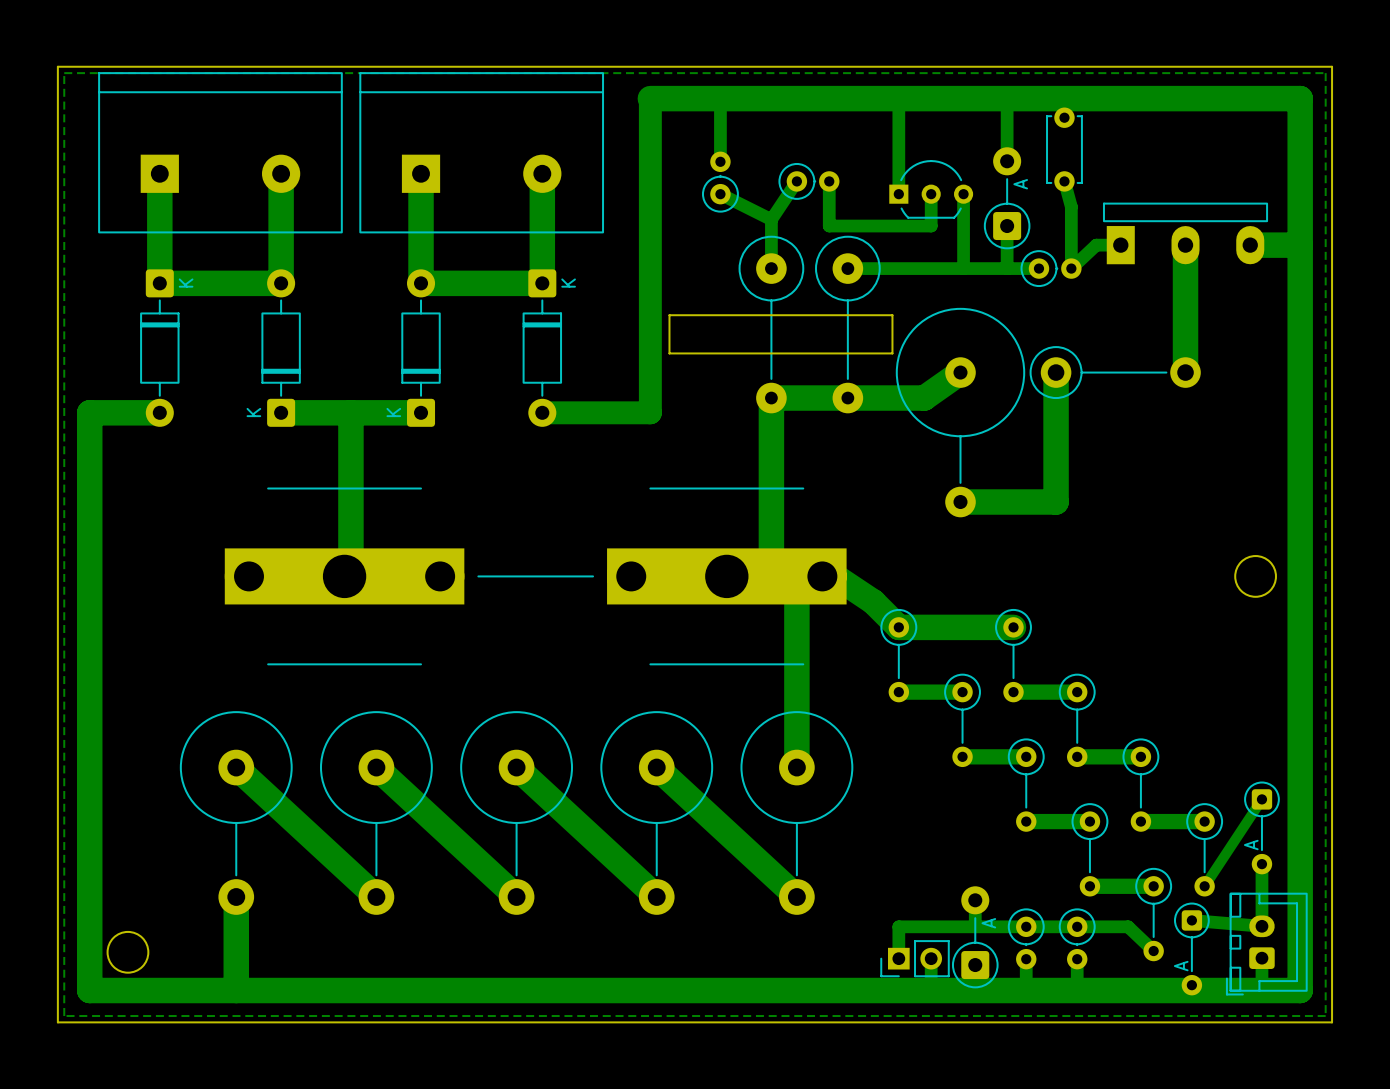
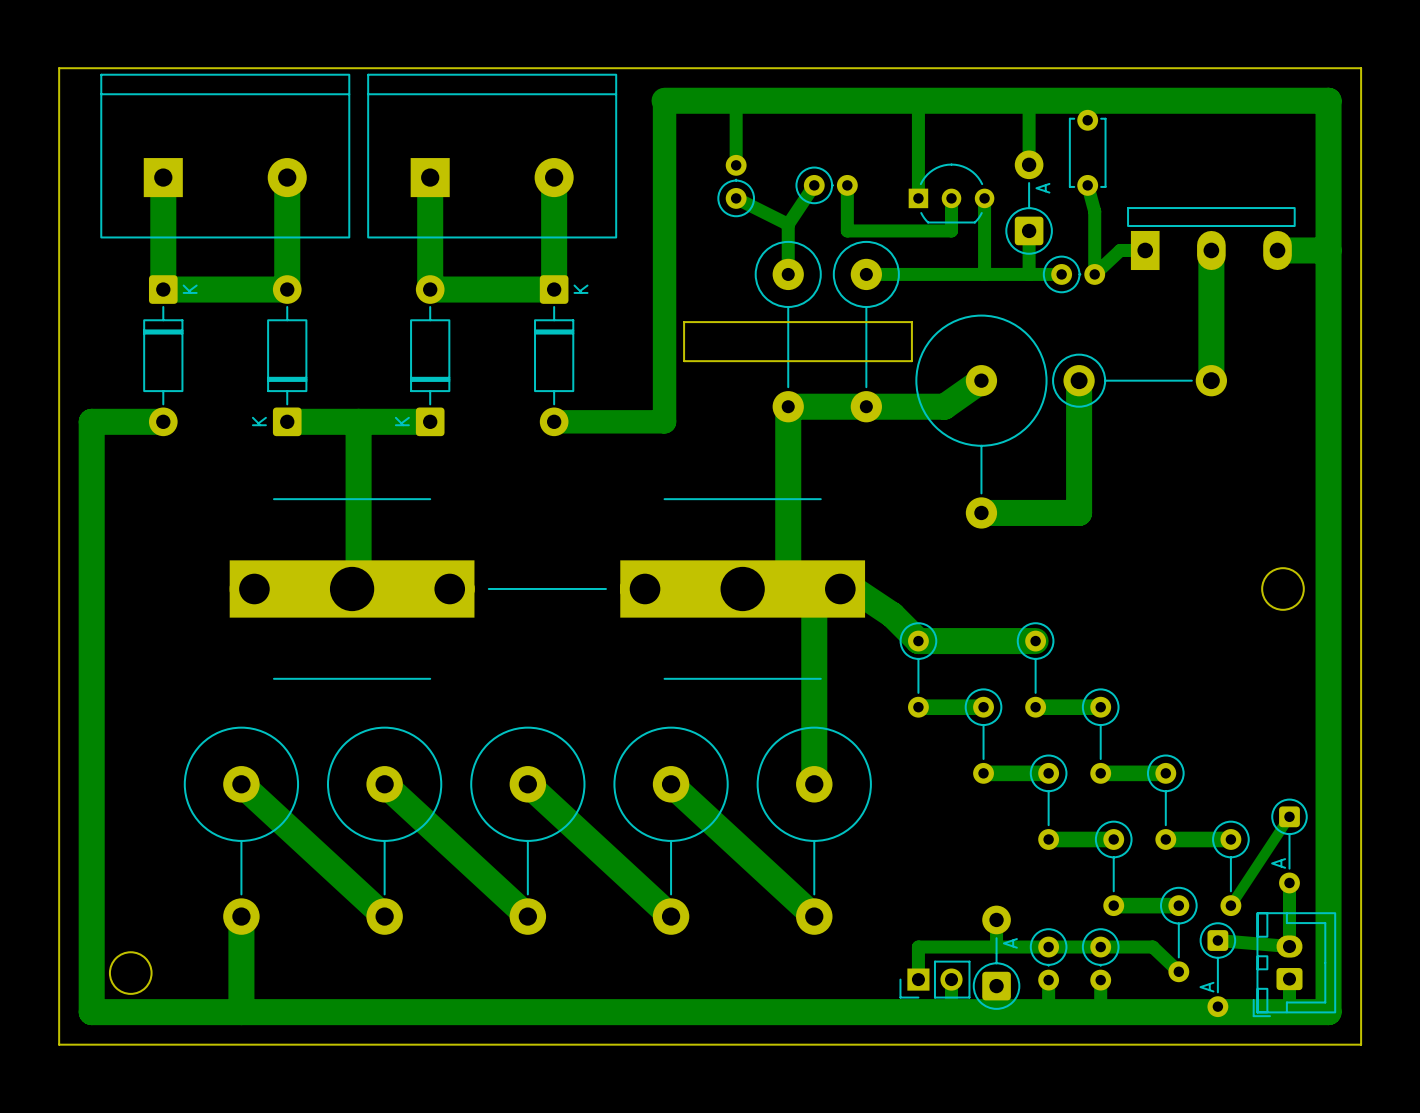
bottom zone outline: (64, 73) (1325, 73) (1325, 1016) (64, 1016) (64, 73) -> none

